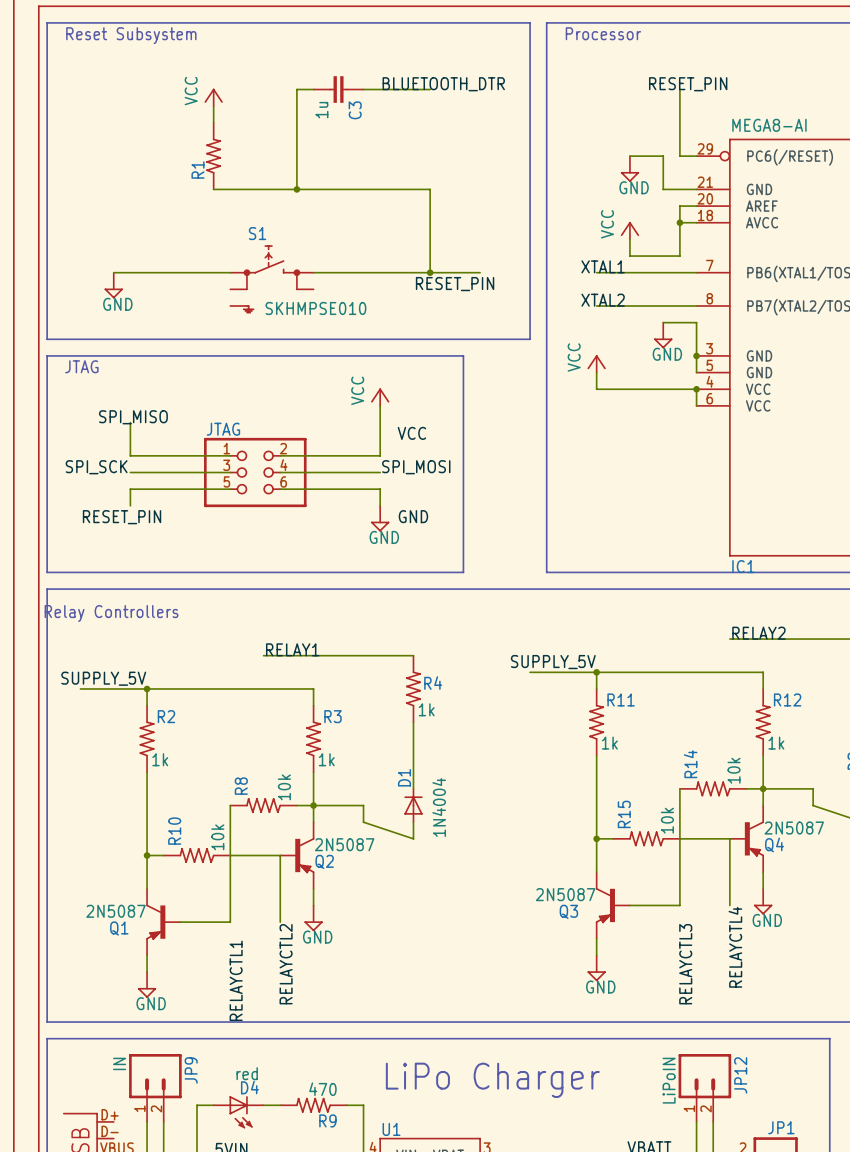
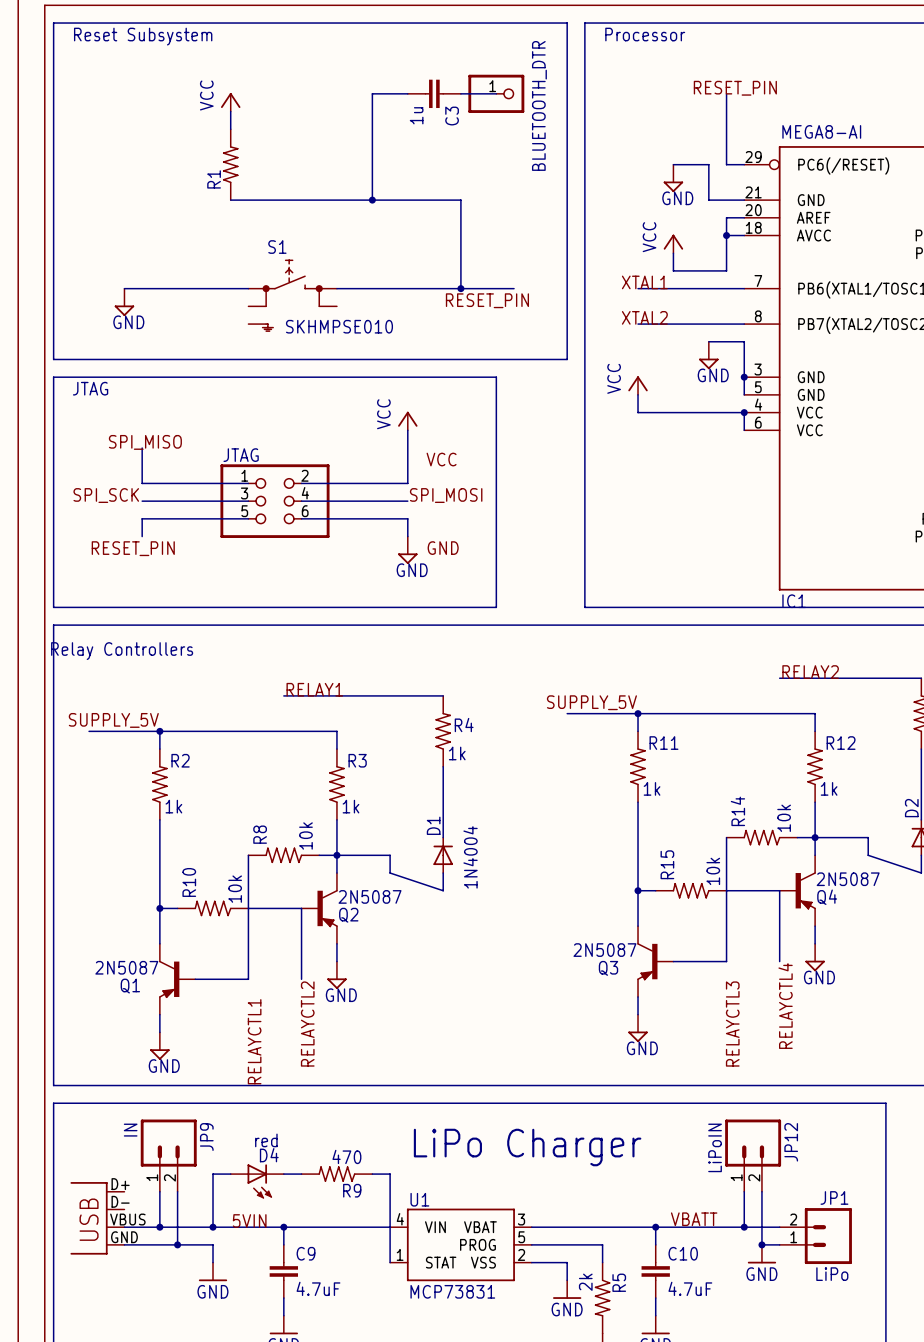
label: BLUETOOTH_DTR (443, 84) -> none
wire: (313, 89) (296, 89) (296, 189) -> (390, 93) (372, 93) (372, 200)
C3 position: (338, 89) -> (434, 93)
BLUETOOTH_DTR: none -> (496, 93)
junction: (296, 189) -> none
junction: none -> (372, 200)

